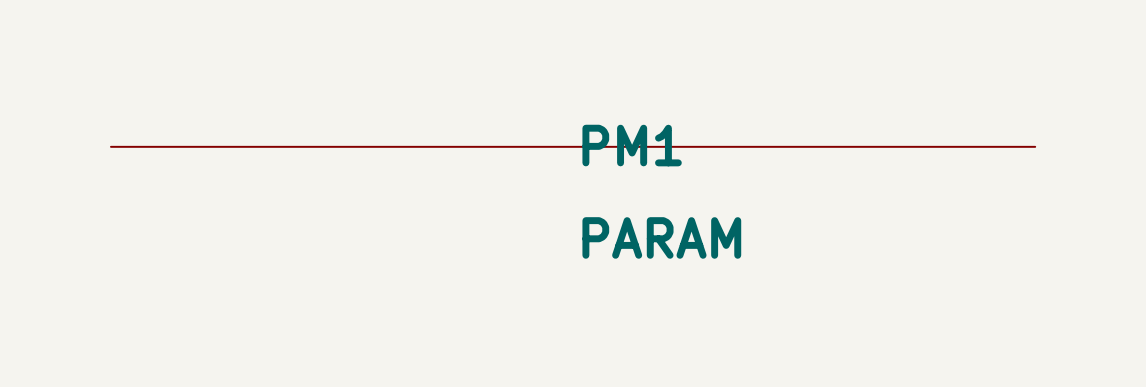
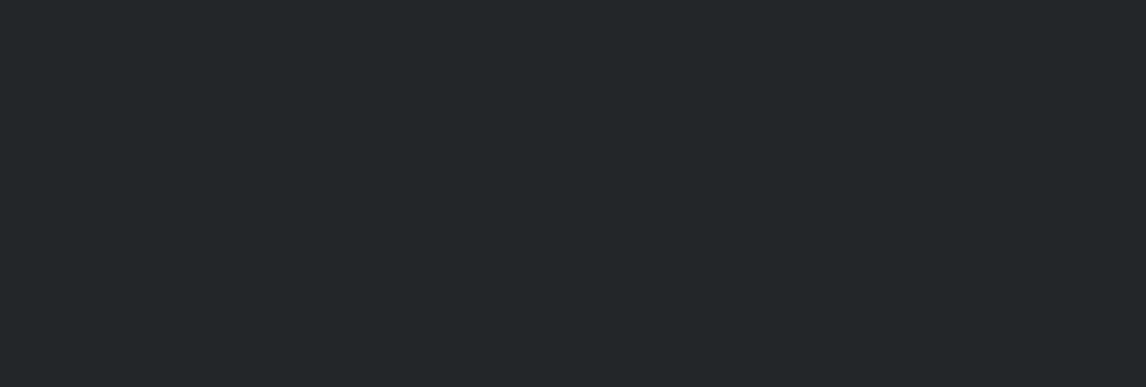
PM1: PARAM (573, 146) -> none

